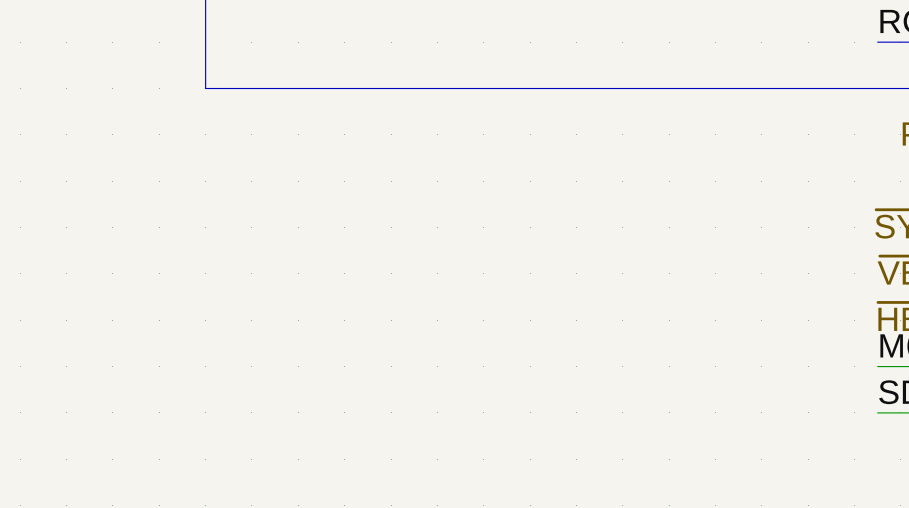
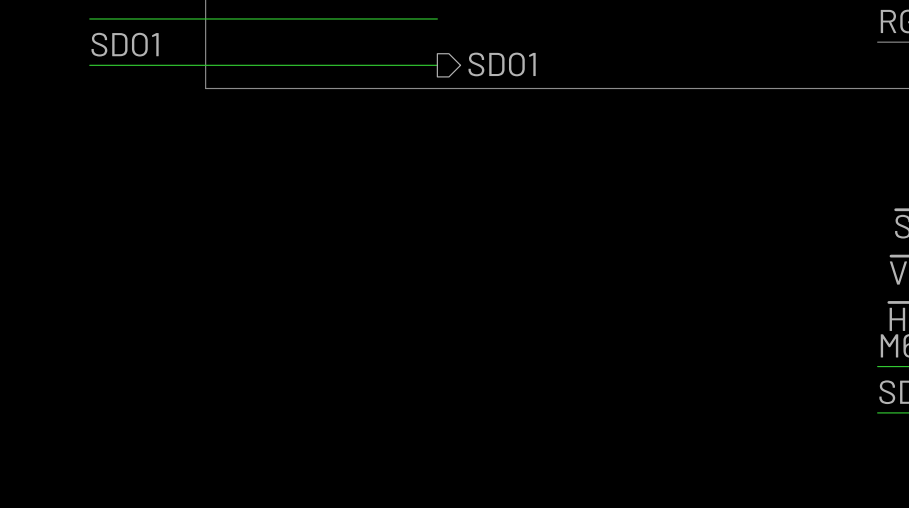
wire: none -> (89, 18) (437, 18)
label: none -> SDO1 (125, 44)
sheet pin: none -> SDO1 (502, 64)
wire: none -> (89, 65) (437, 65)

